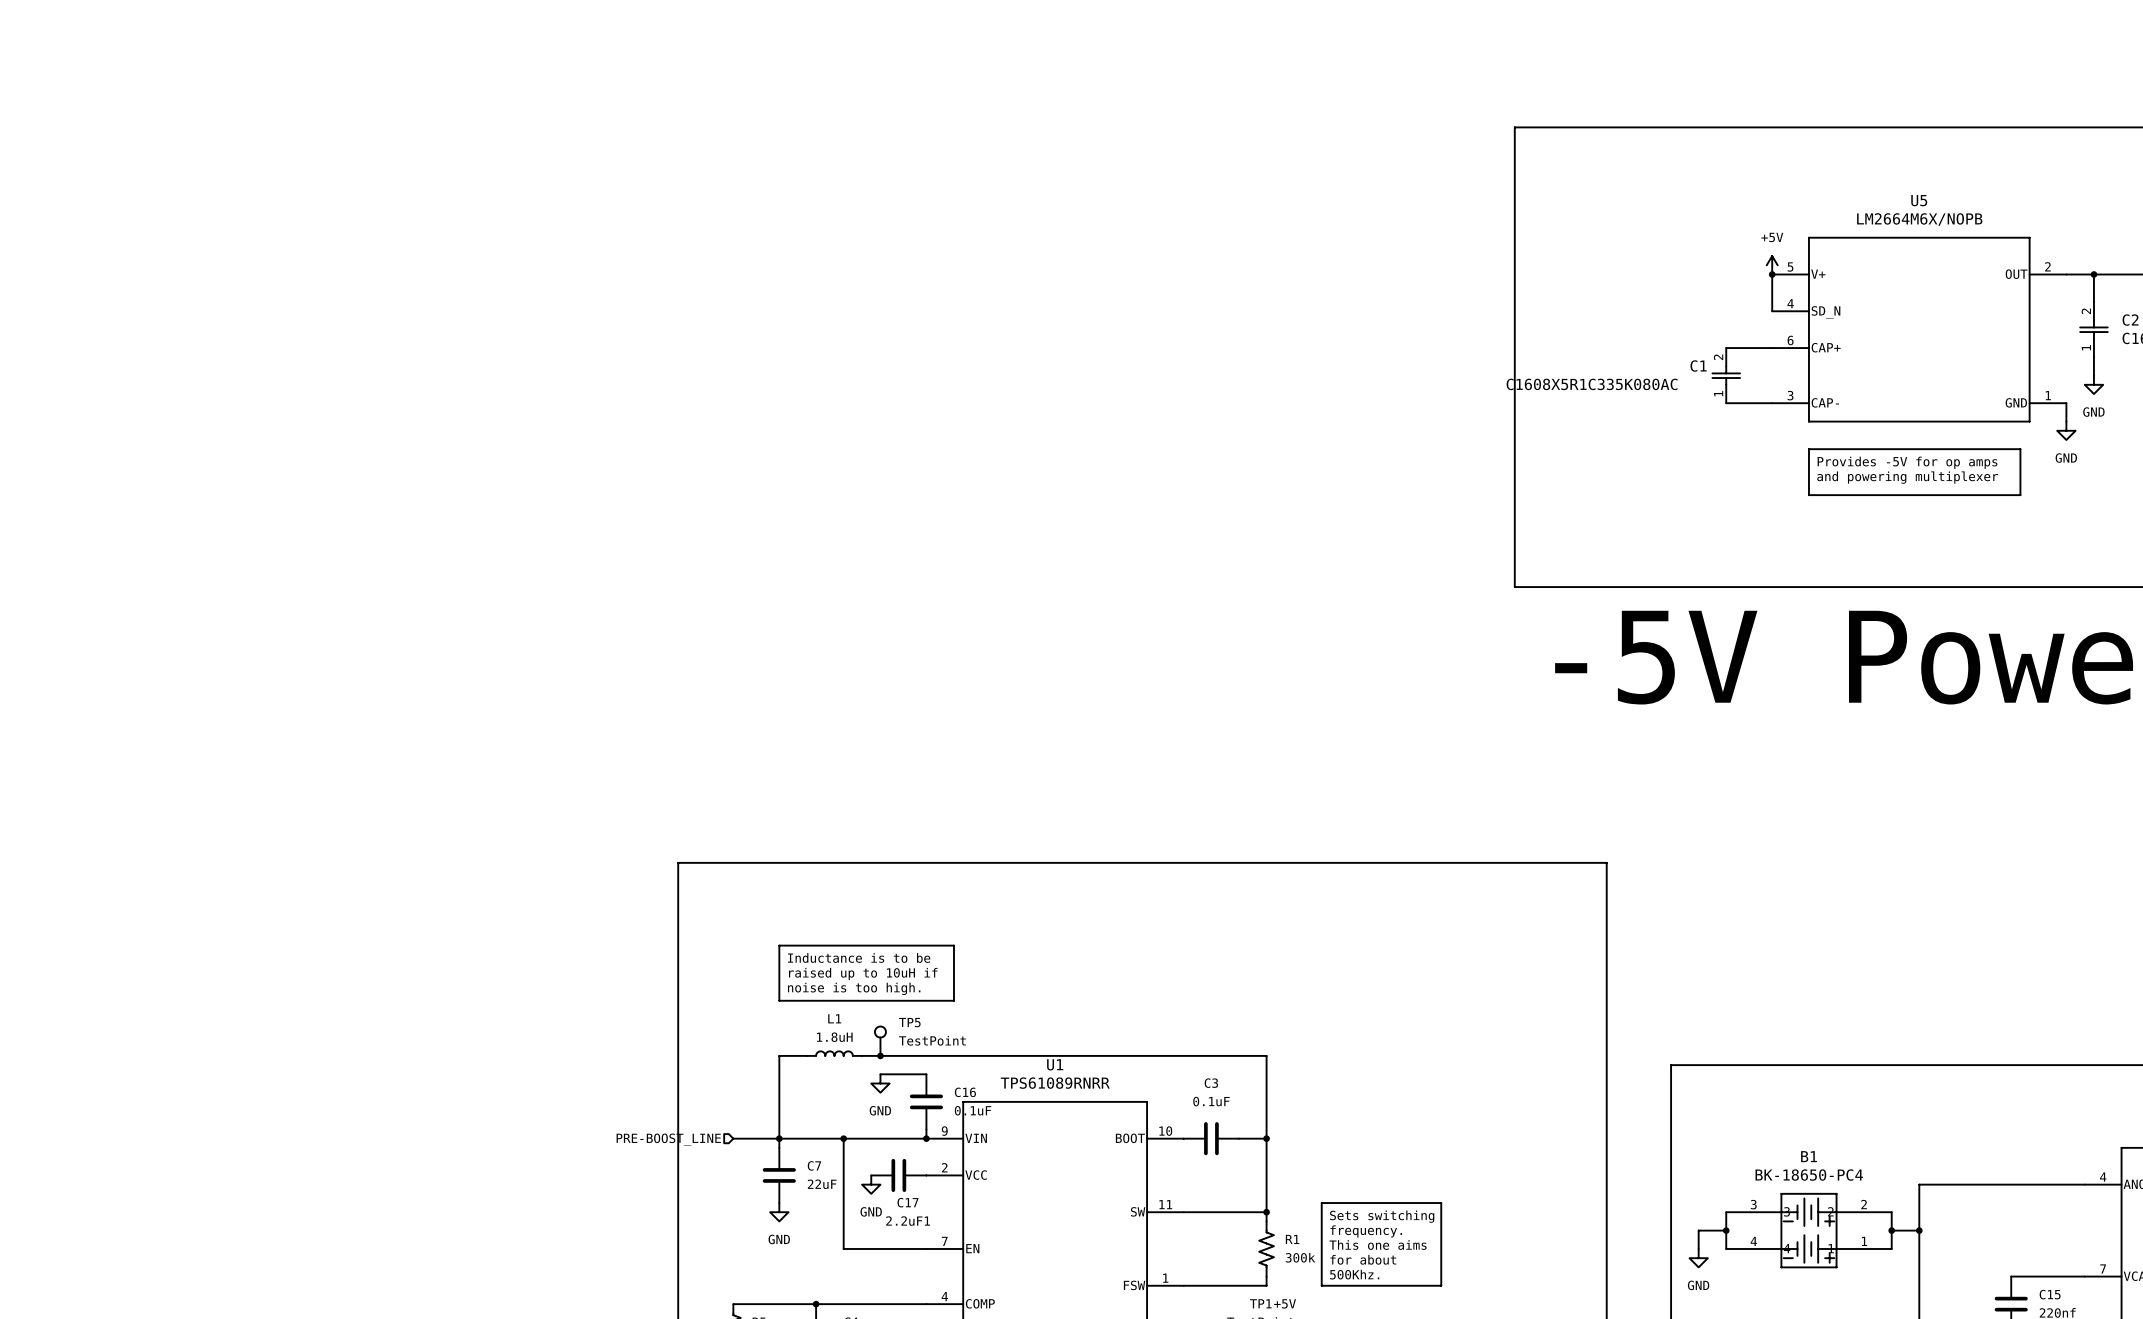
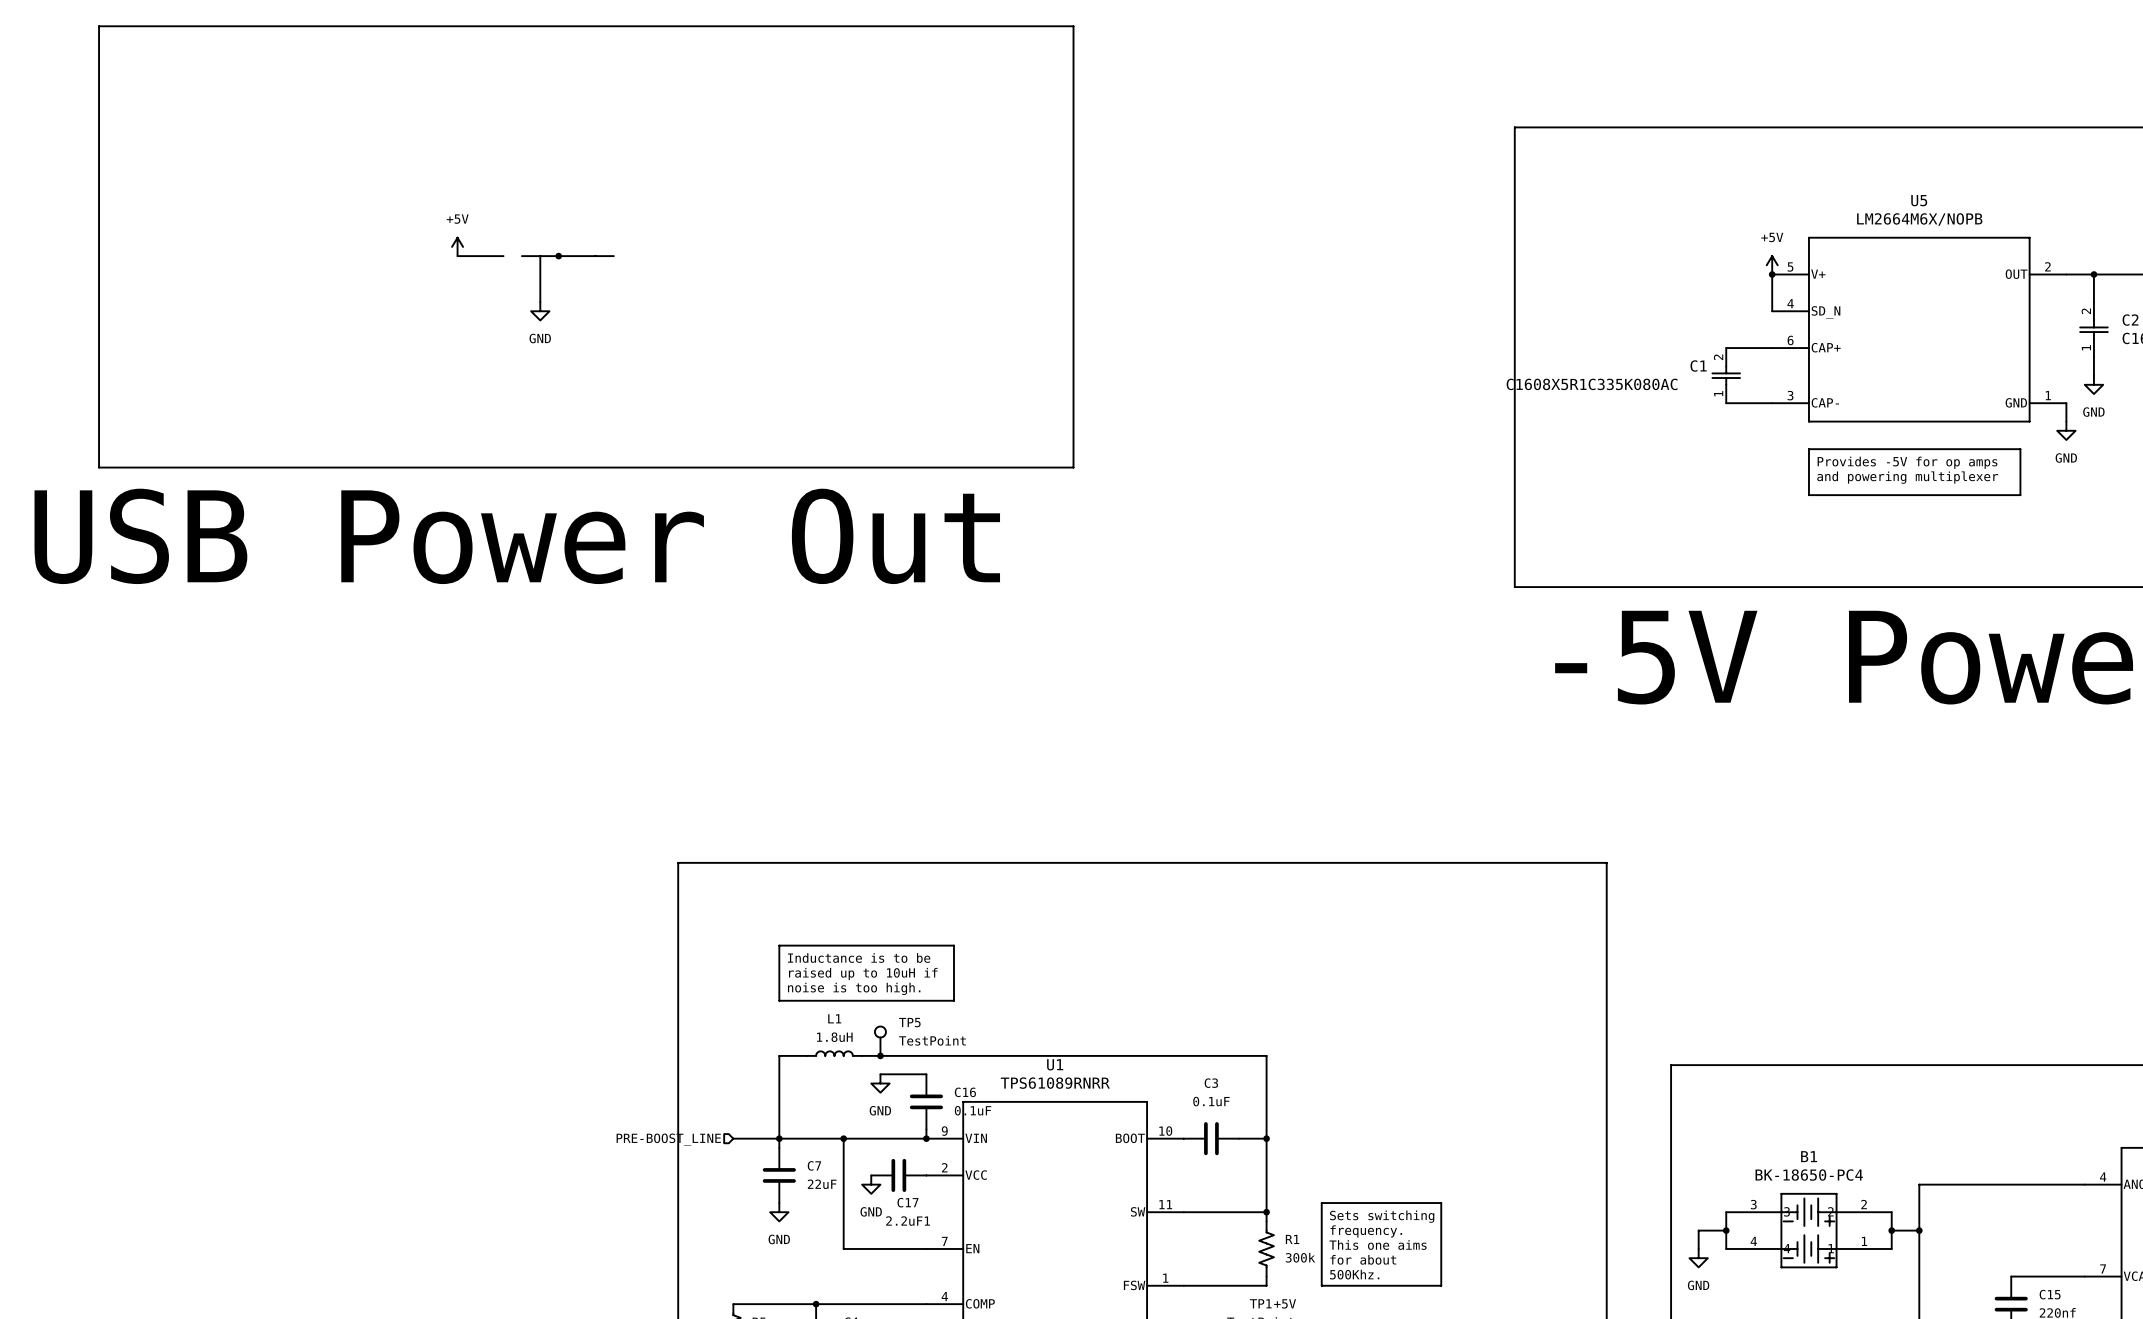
line: none -> (99, 26) (1073, 26) (1073, 467) (99, 467) (99, 26)
power symbol: none -> +5V (457, 246)
wire: none -> (457, 256) (503, 256)
wire: none -> (521, 256) (613, 256)
wire: none -> (540, 256) (540, 302)
junction: none -> (558, 256)
power symbol: none -> GND (540, 311)
text: none -> USB Power Out (517, 536)

